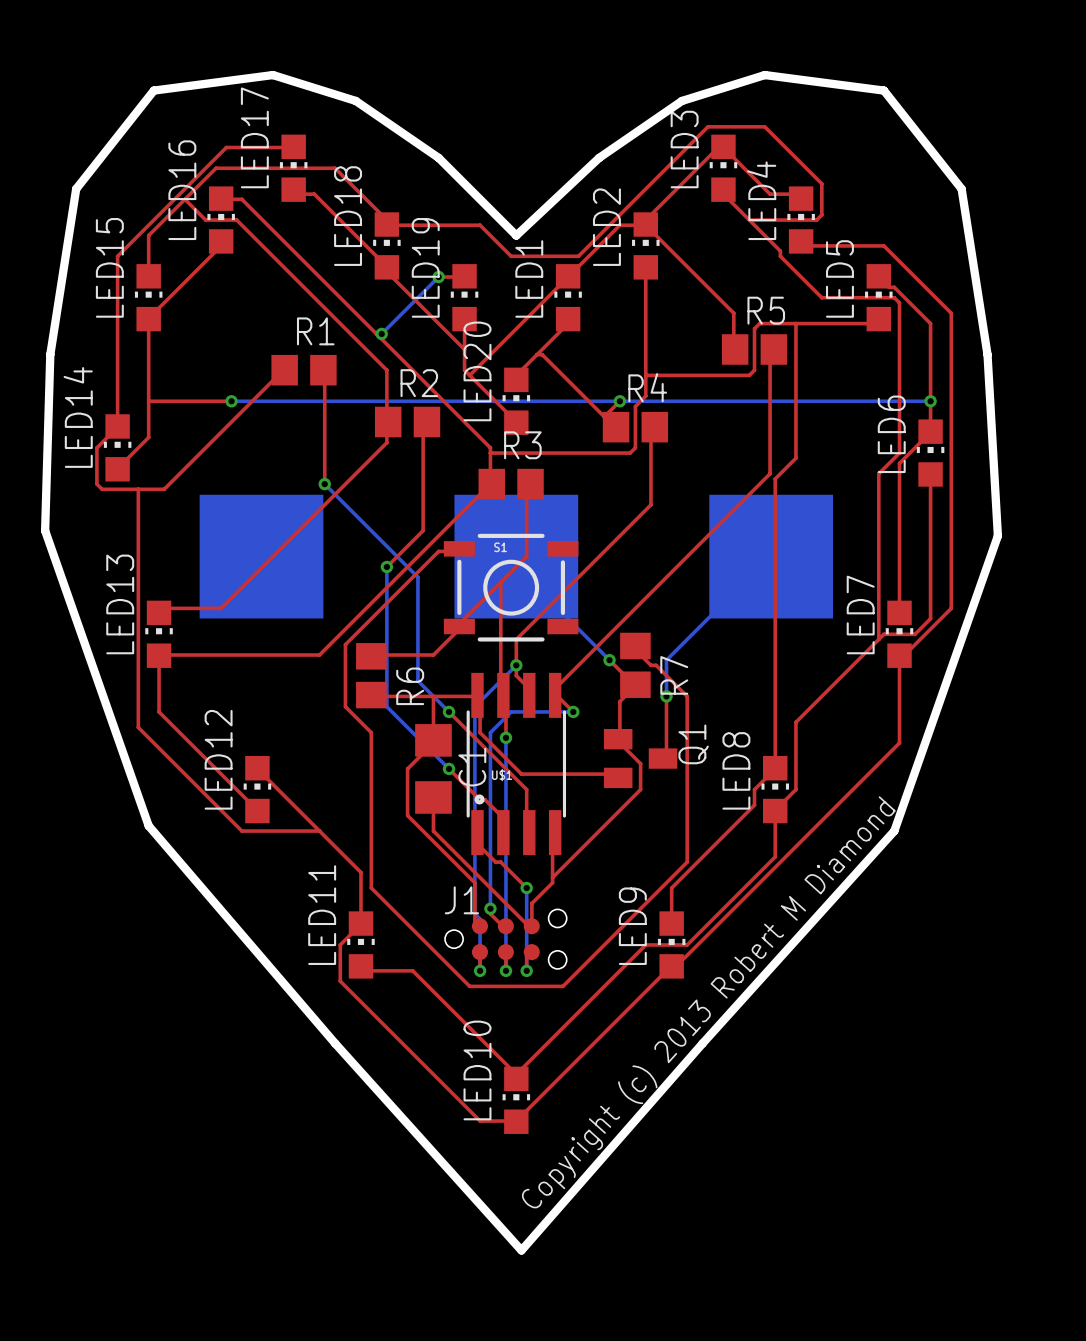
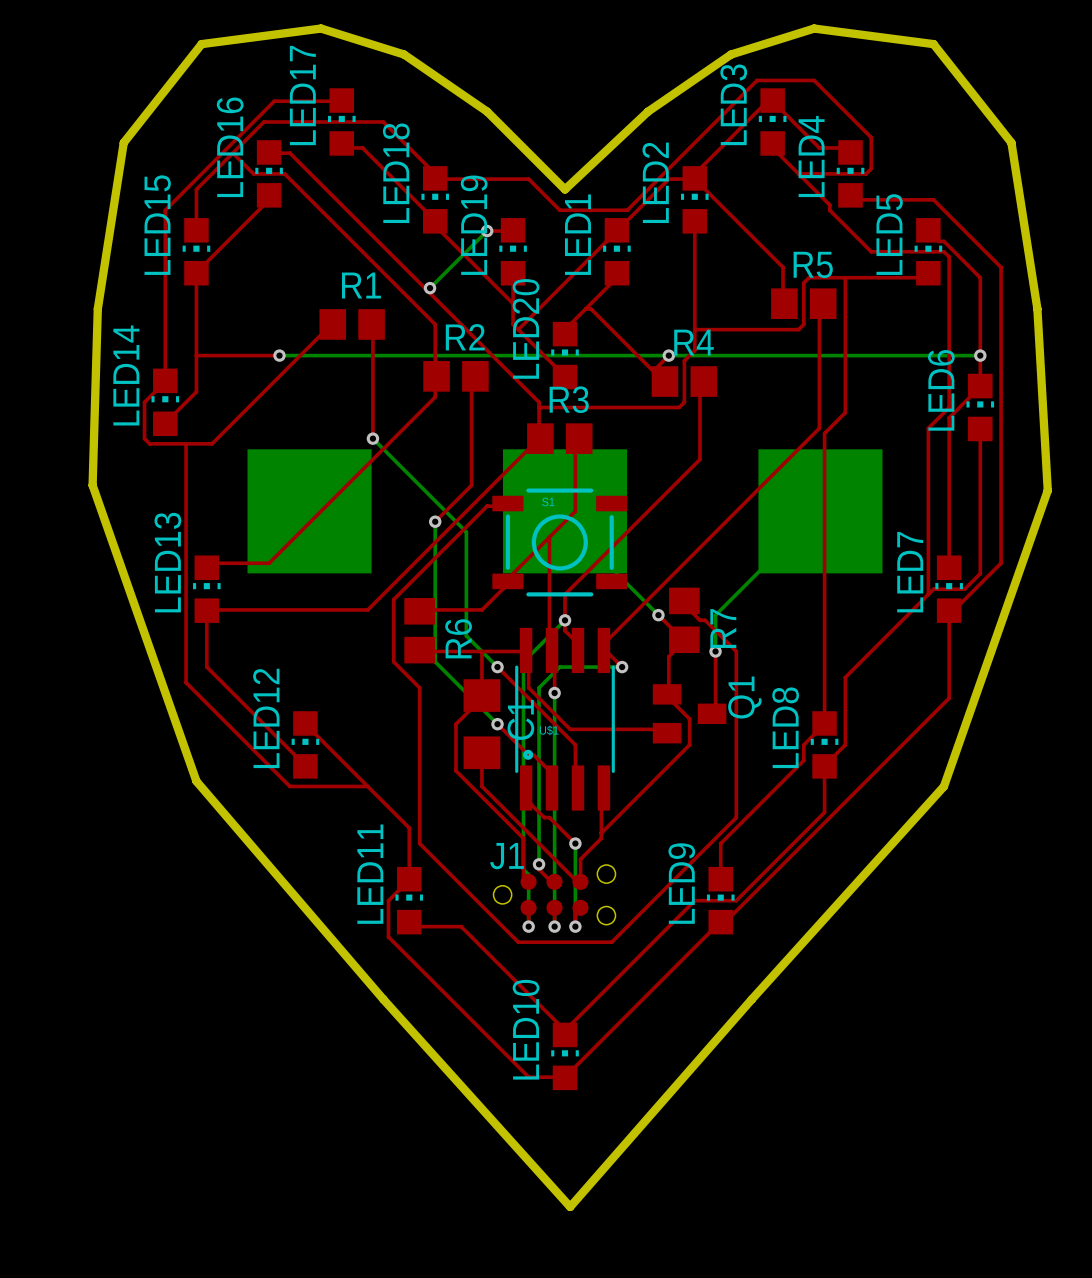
text: Copyright (c) 2013 Robert M Diamond (708, 1002) -> none

